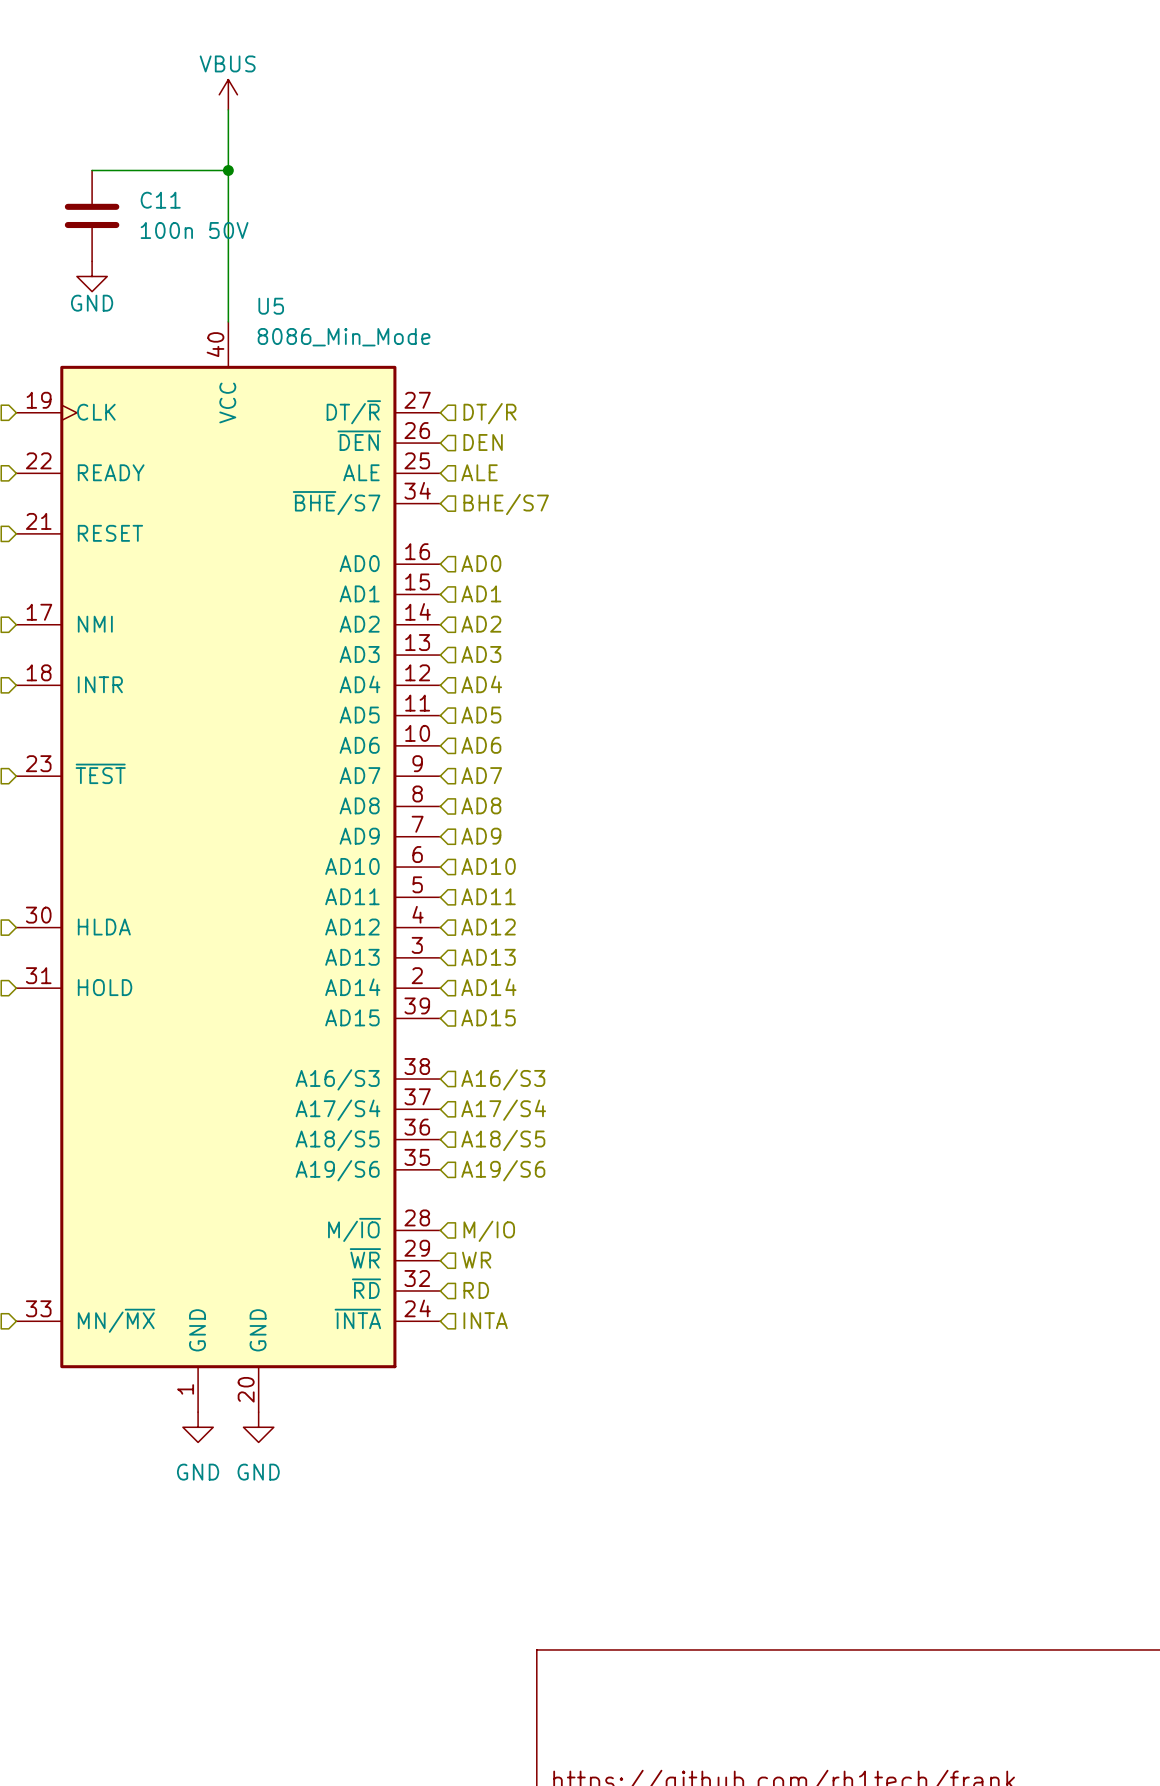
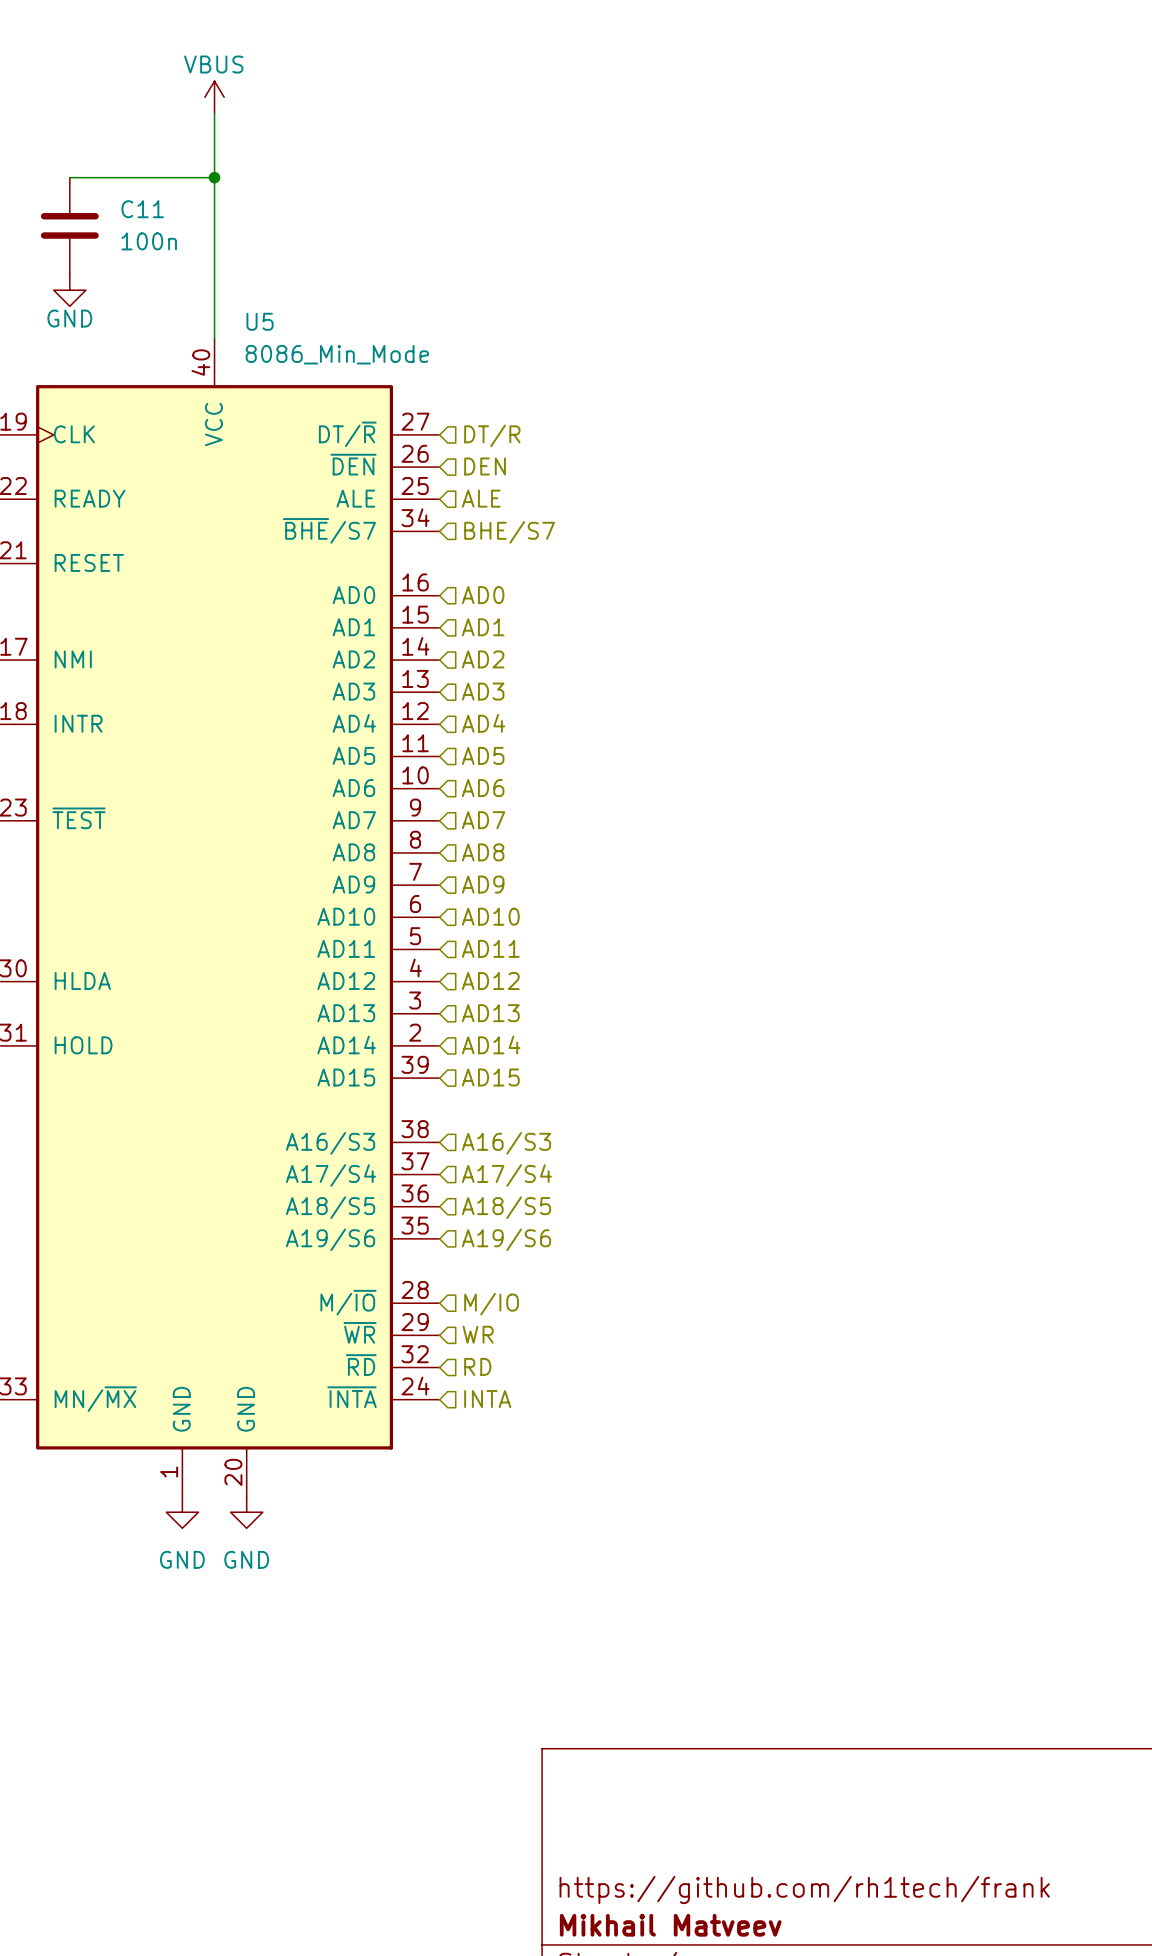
C11 value: 100n 50V (194, 230) -> 100n (149, 241)

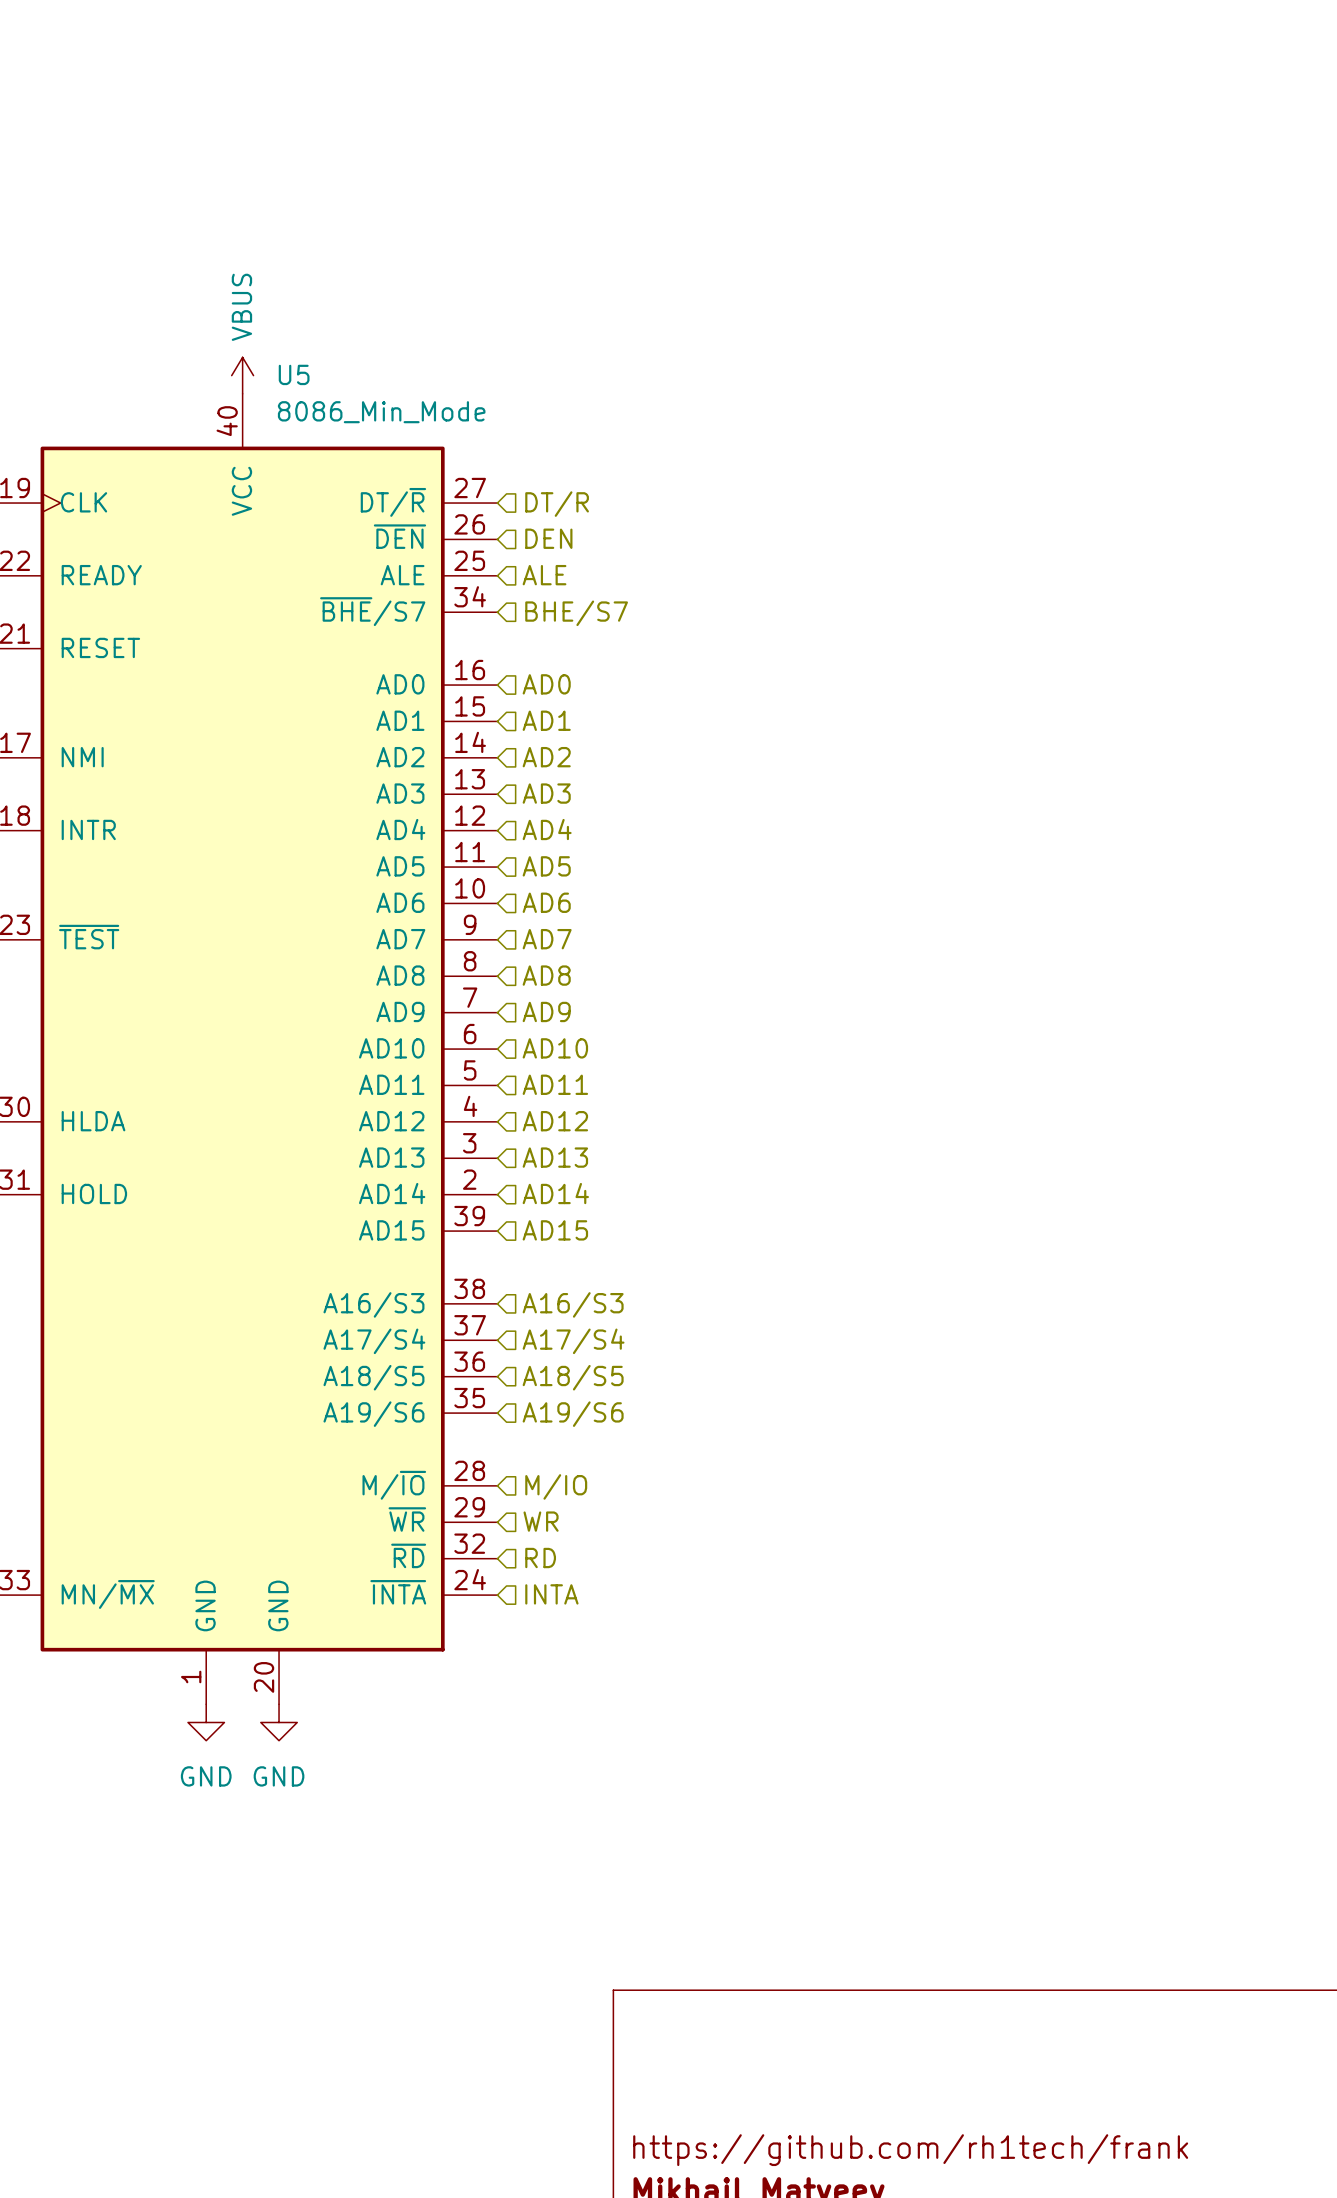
power symbol text rotation: 0° (213, 64) -> 90° counterclockwise (241, 307)
power symbol position: VBUS (214, 97) -> VBUS (242, 375)
wire: (214, 113) (214, 338) -> none
wire: (69, 177) (214, 177) -> none
junction: (214, 177) -> none
C11: 100n (69, 225) -> none
power symbol: GND (69, 290) -> none

